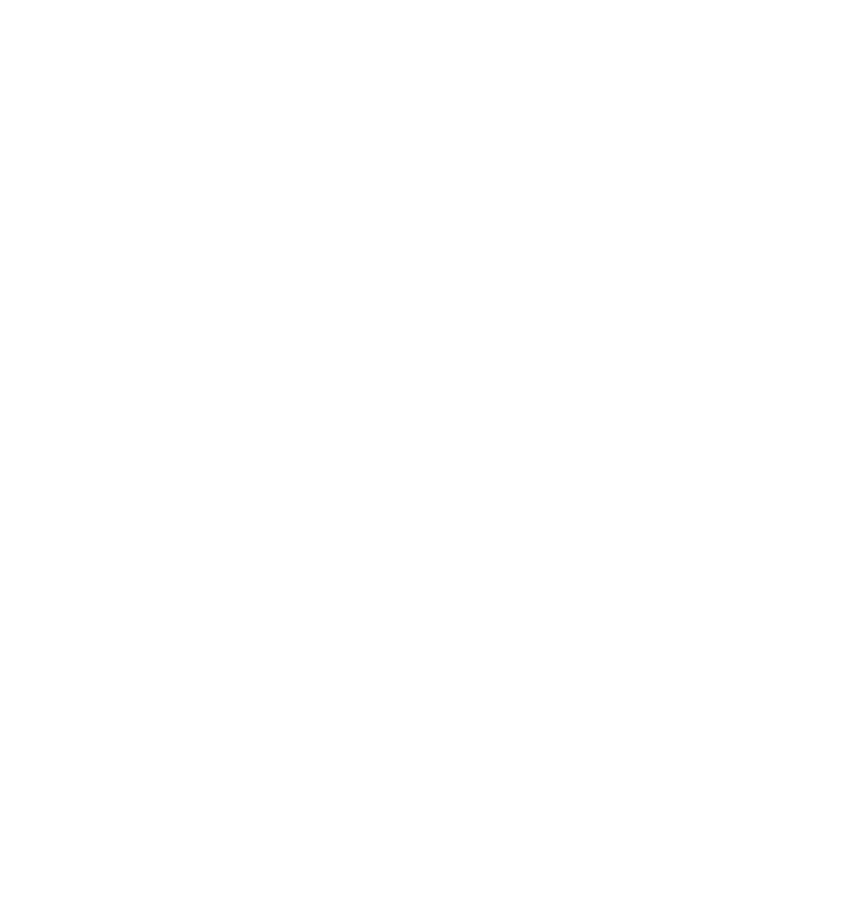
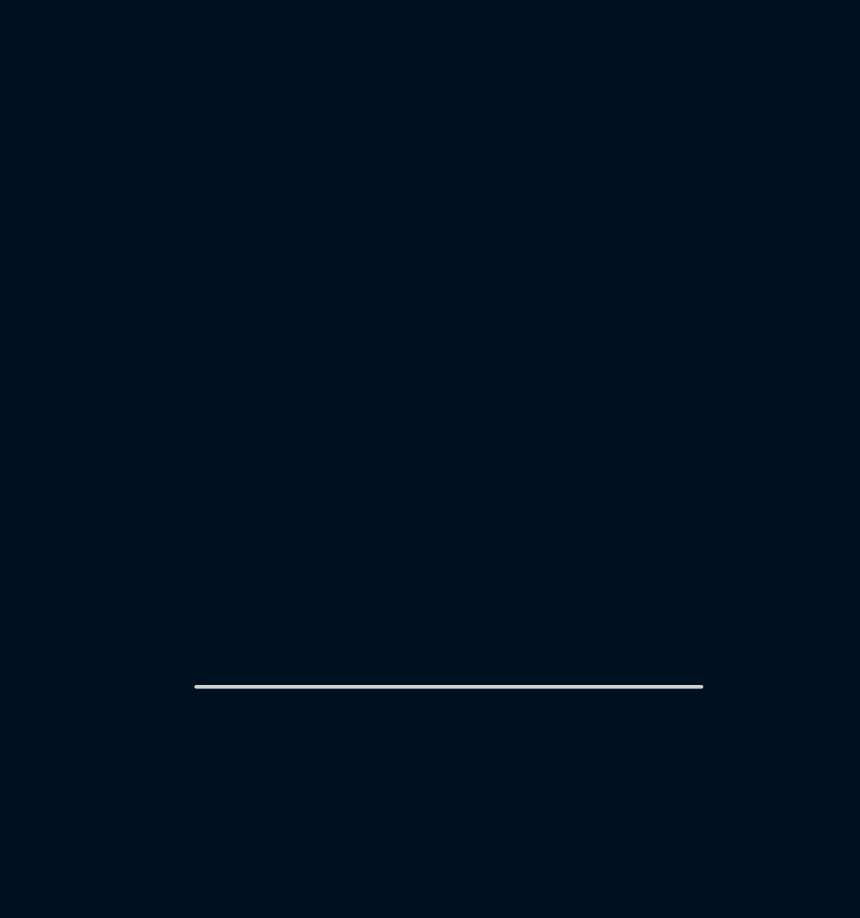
board edge: none -> (196, 686) (701, 686)

